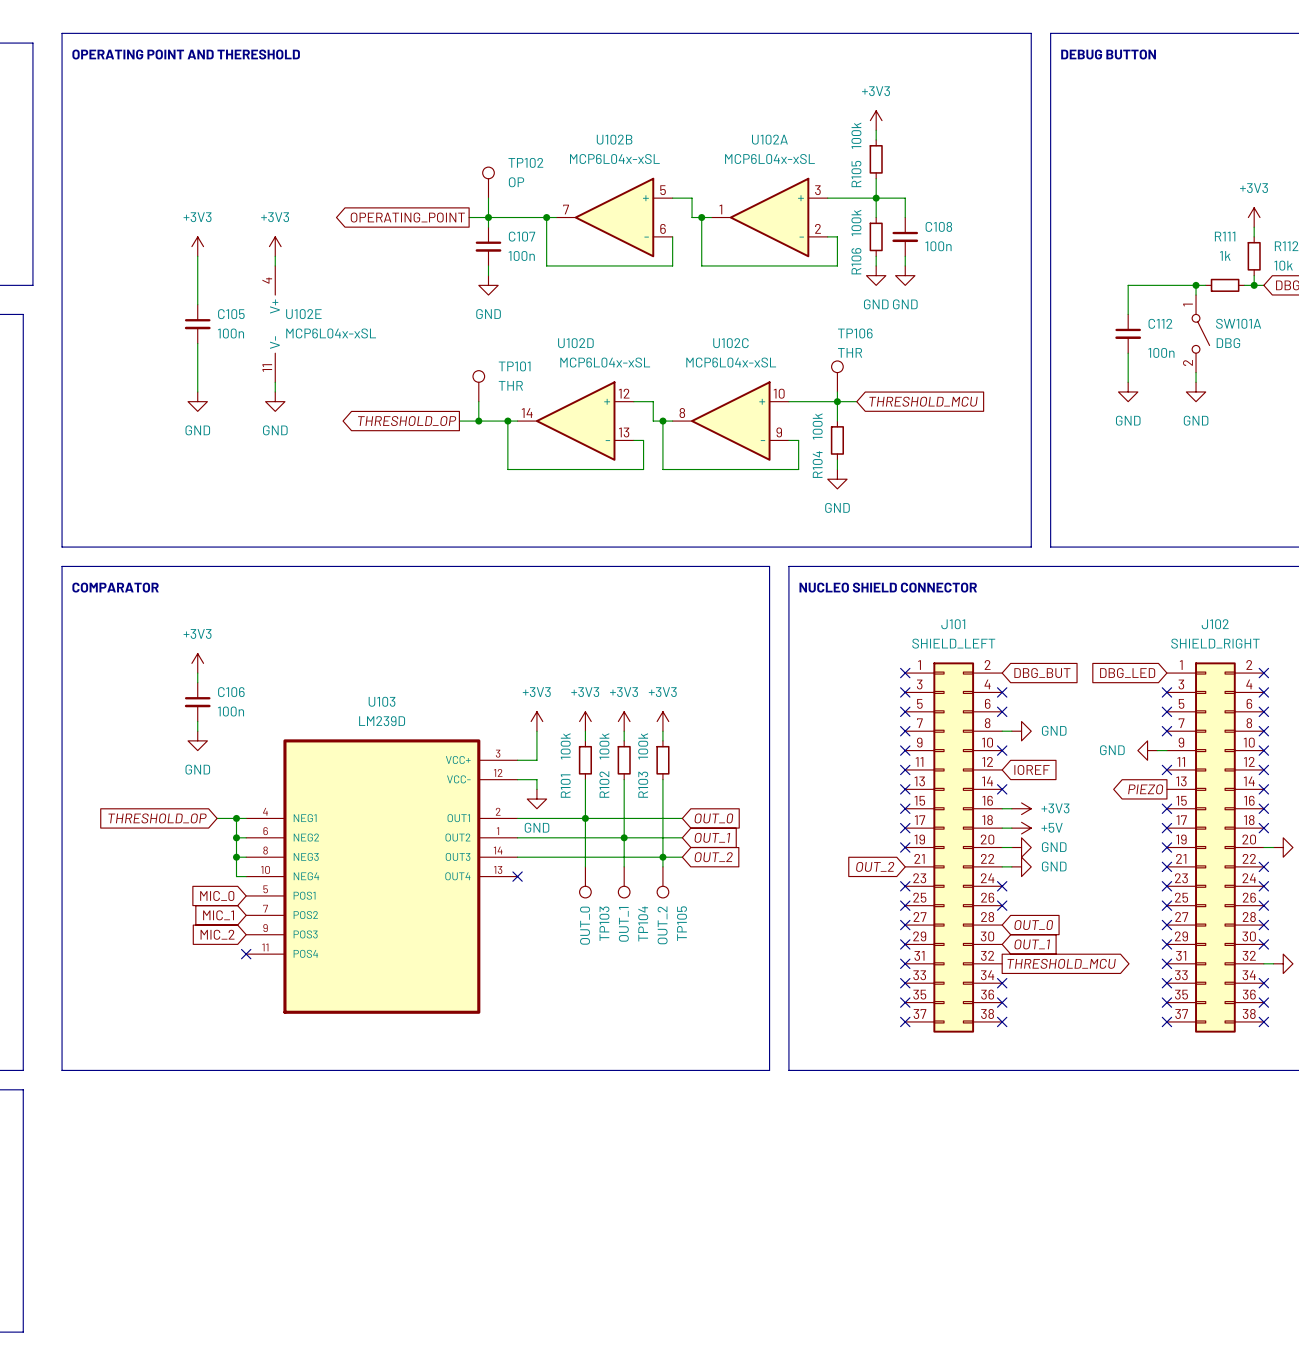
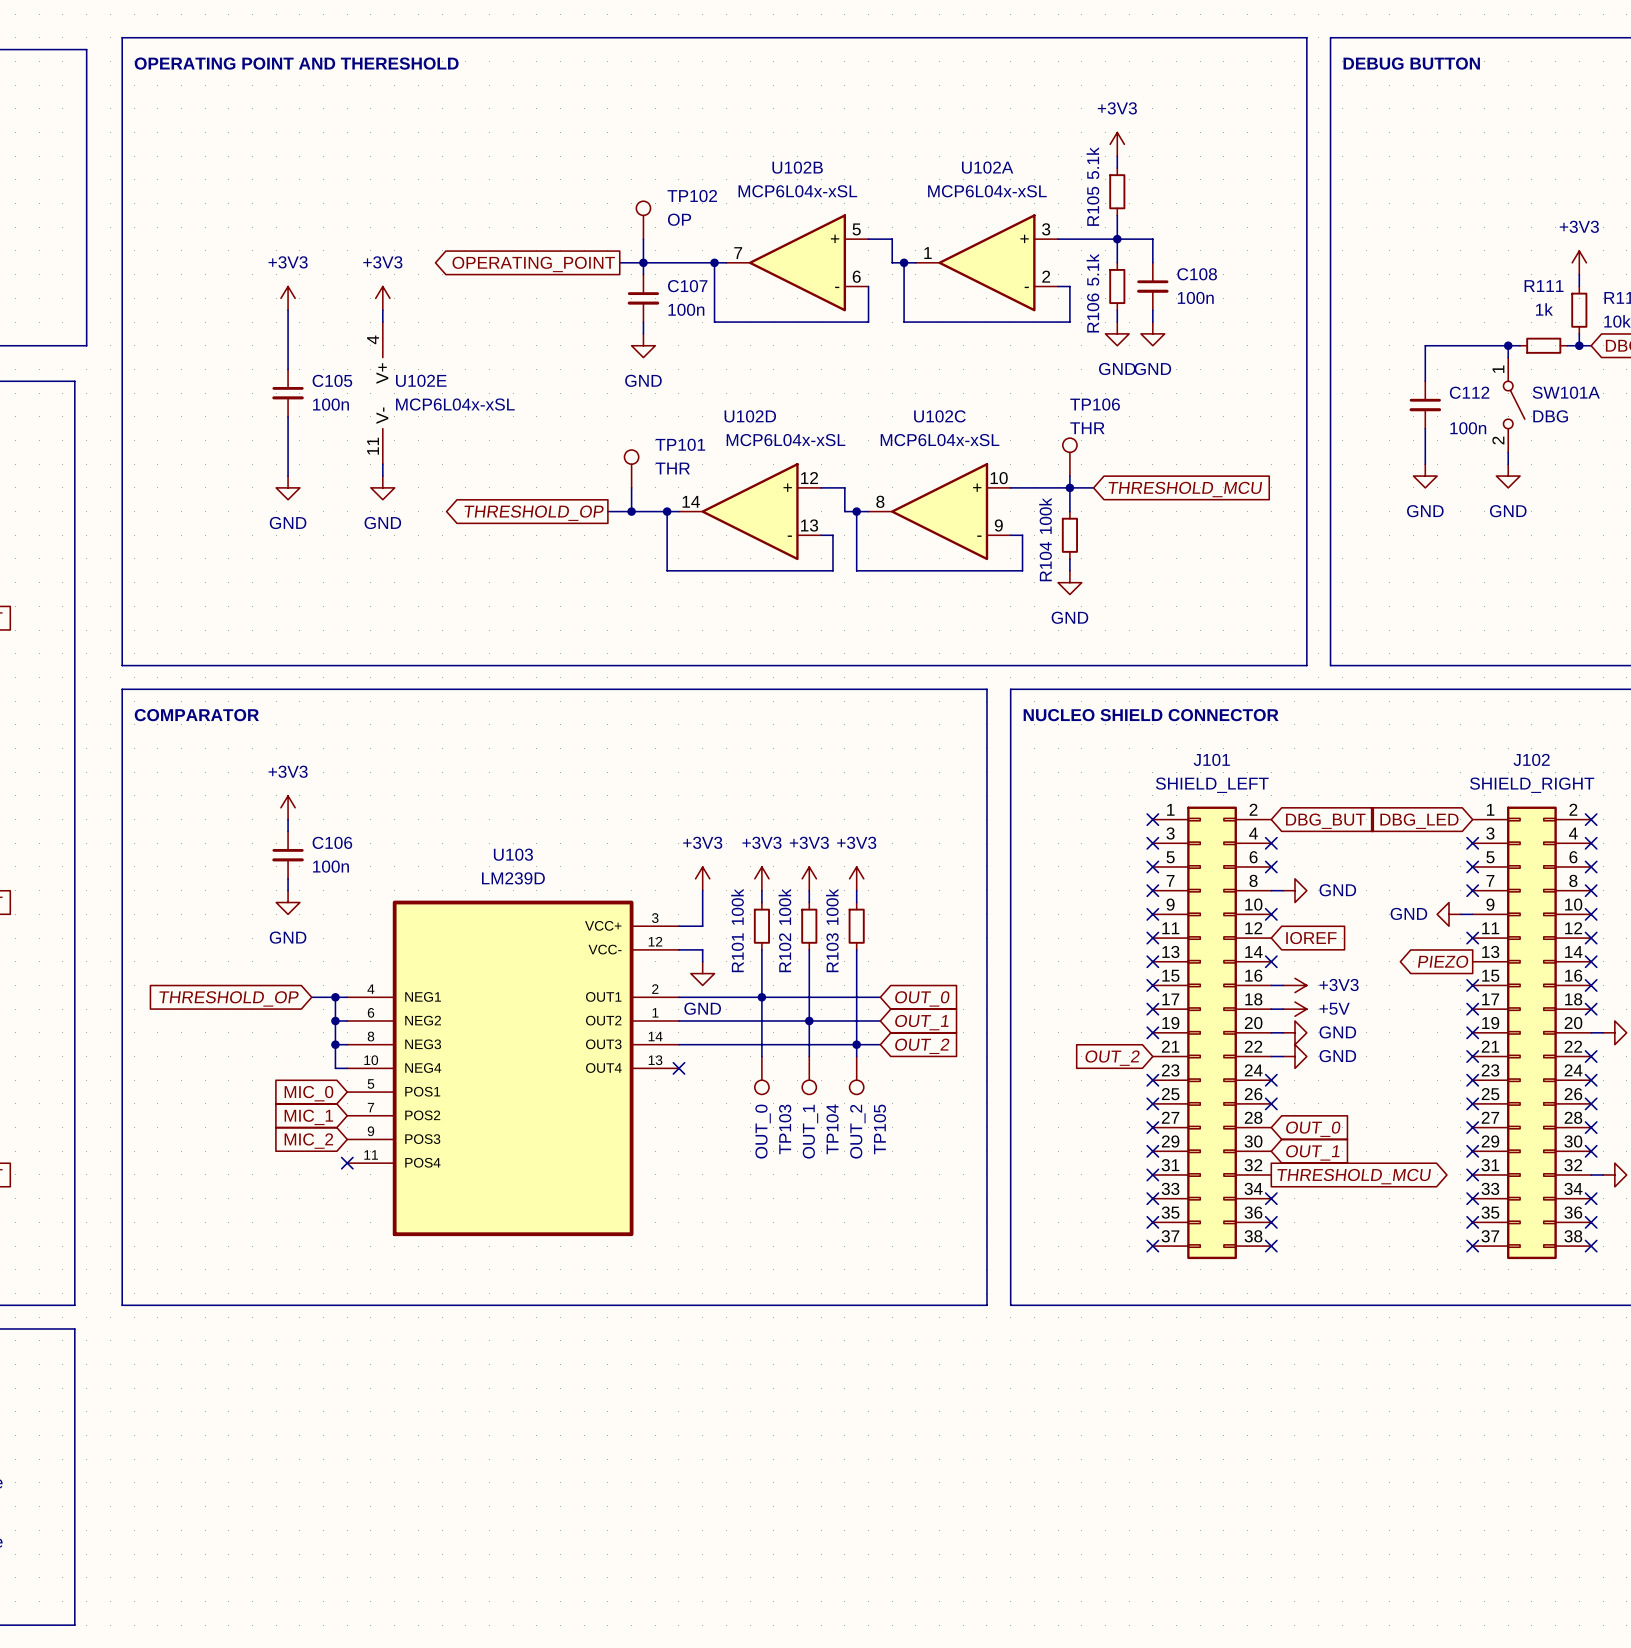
R105 value: 100k (856, 135) -> 5.1k (1092, 163)
R106 value: 100k (856, 222) -> 5.1k (1092, 269)

